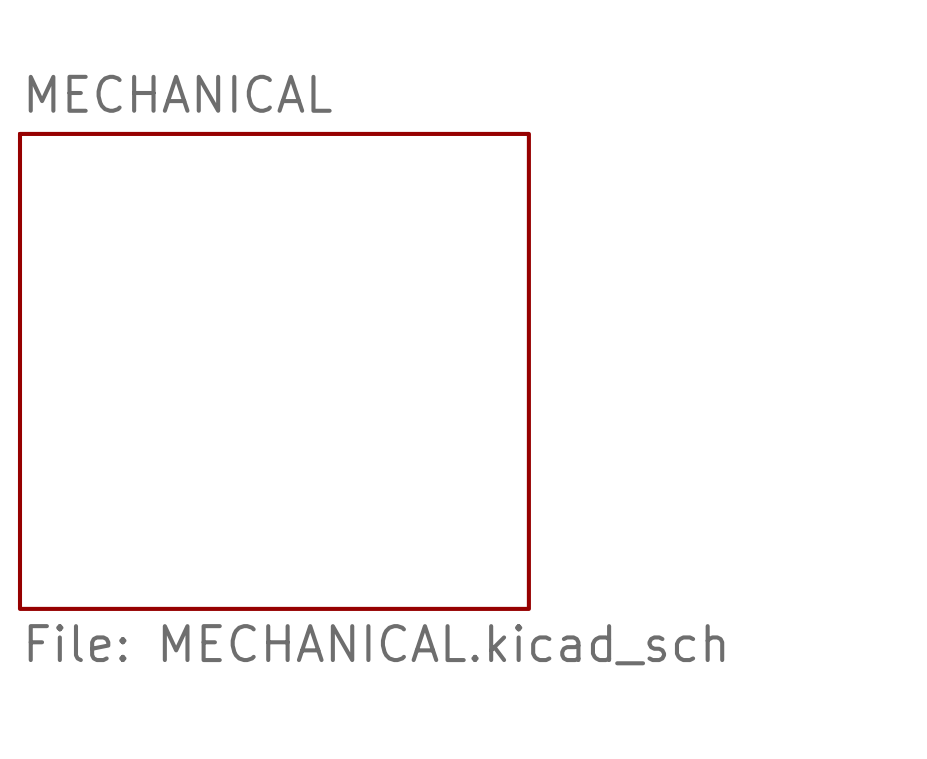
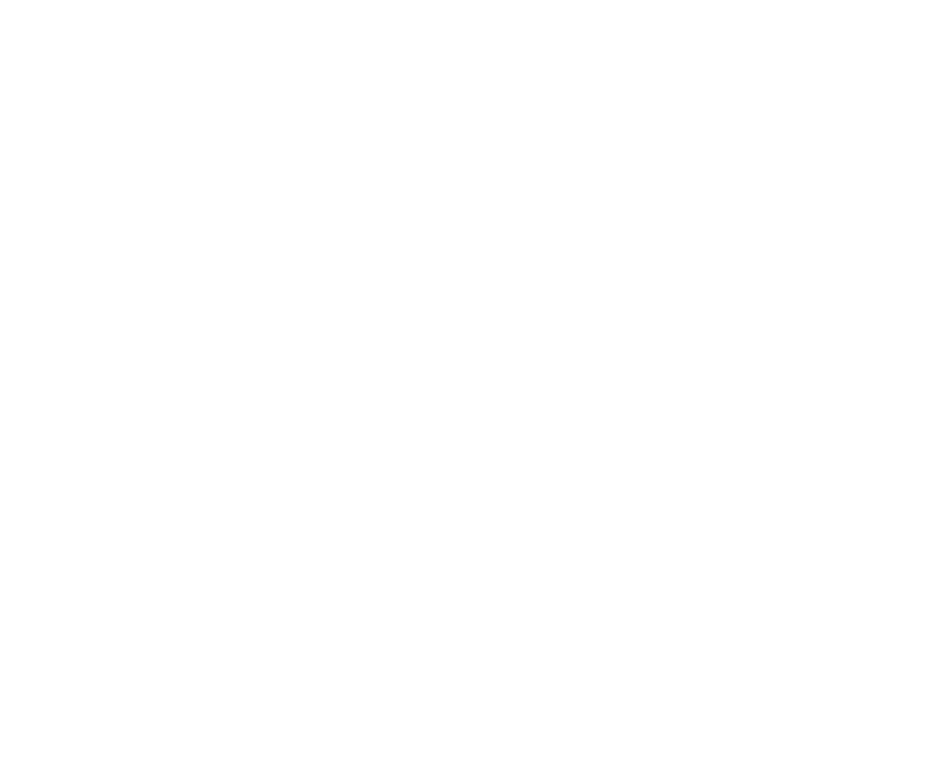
sheet MECHANICAL: File: MECHANICAL.kicad_sch (274, 371) -> none

